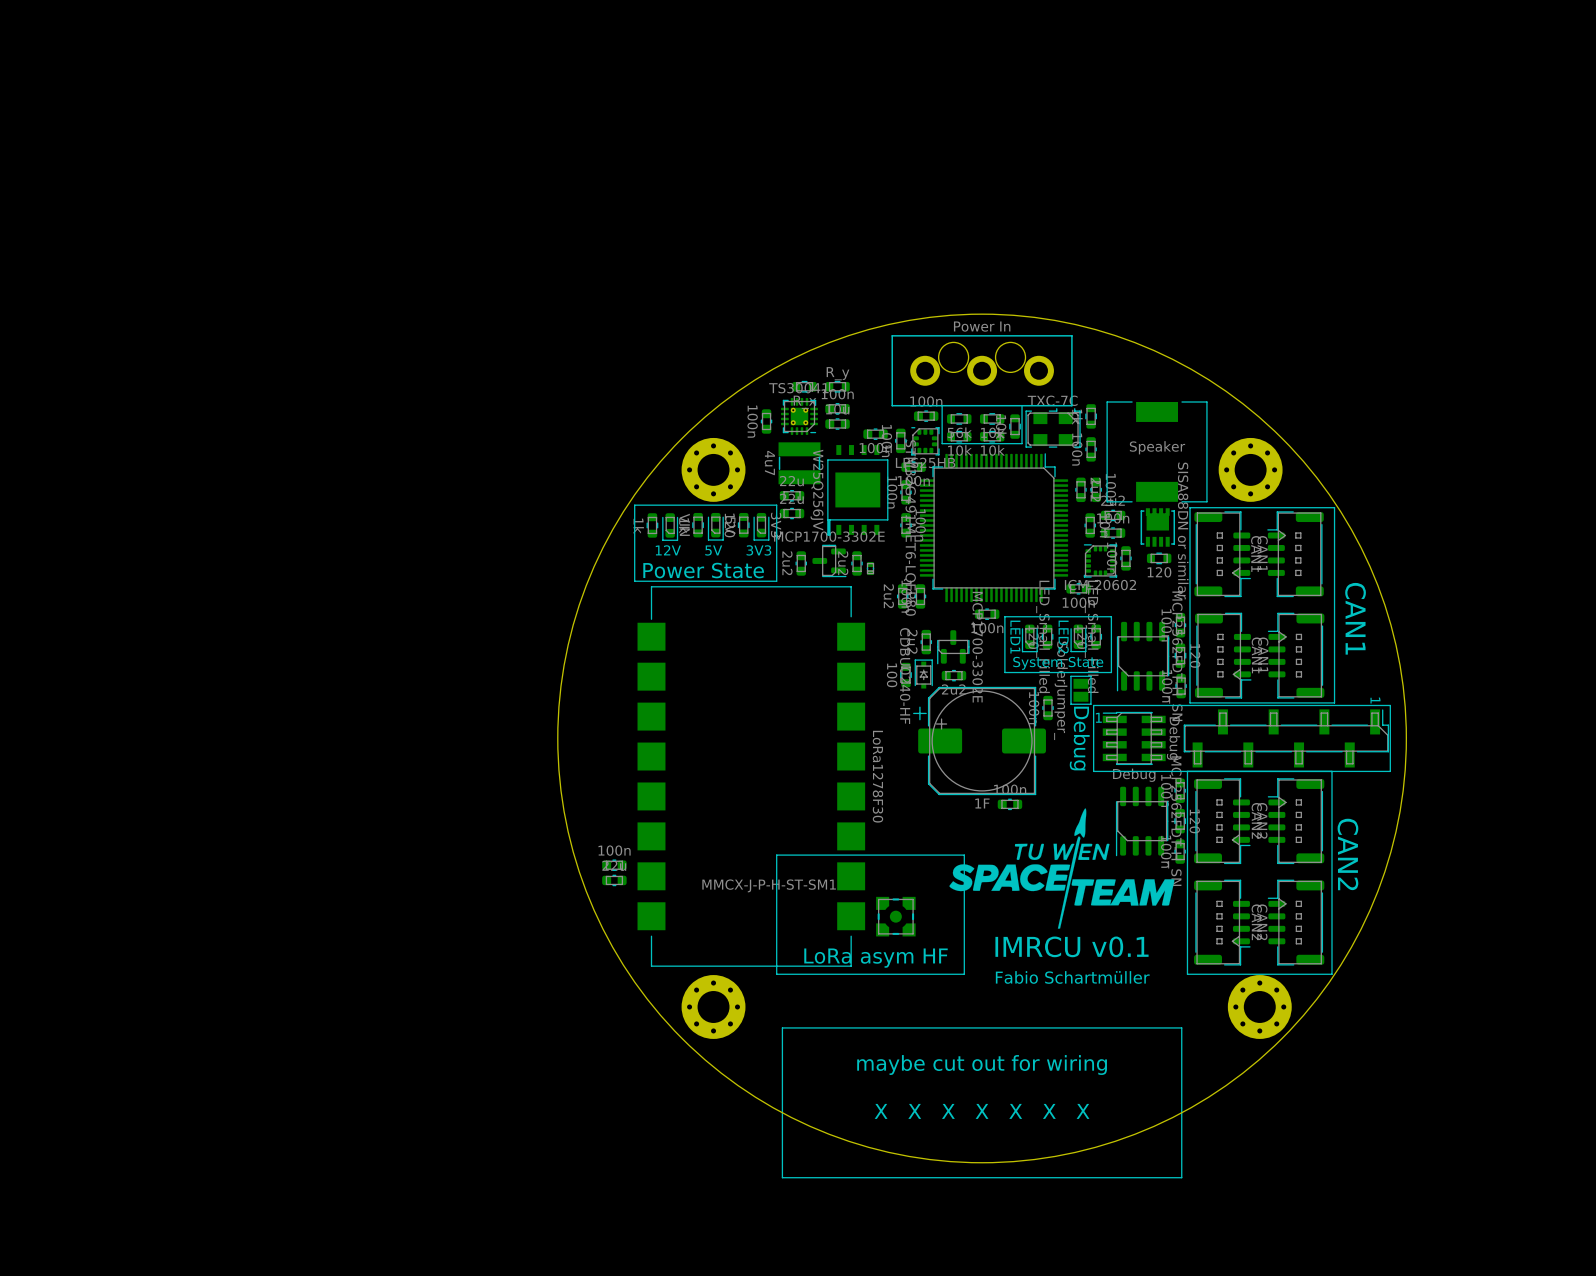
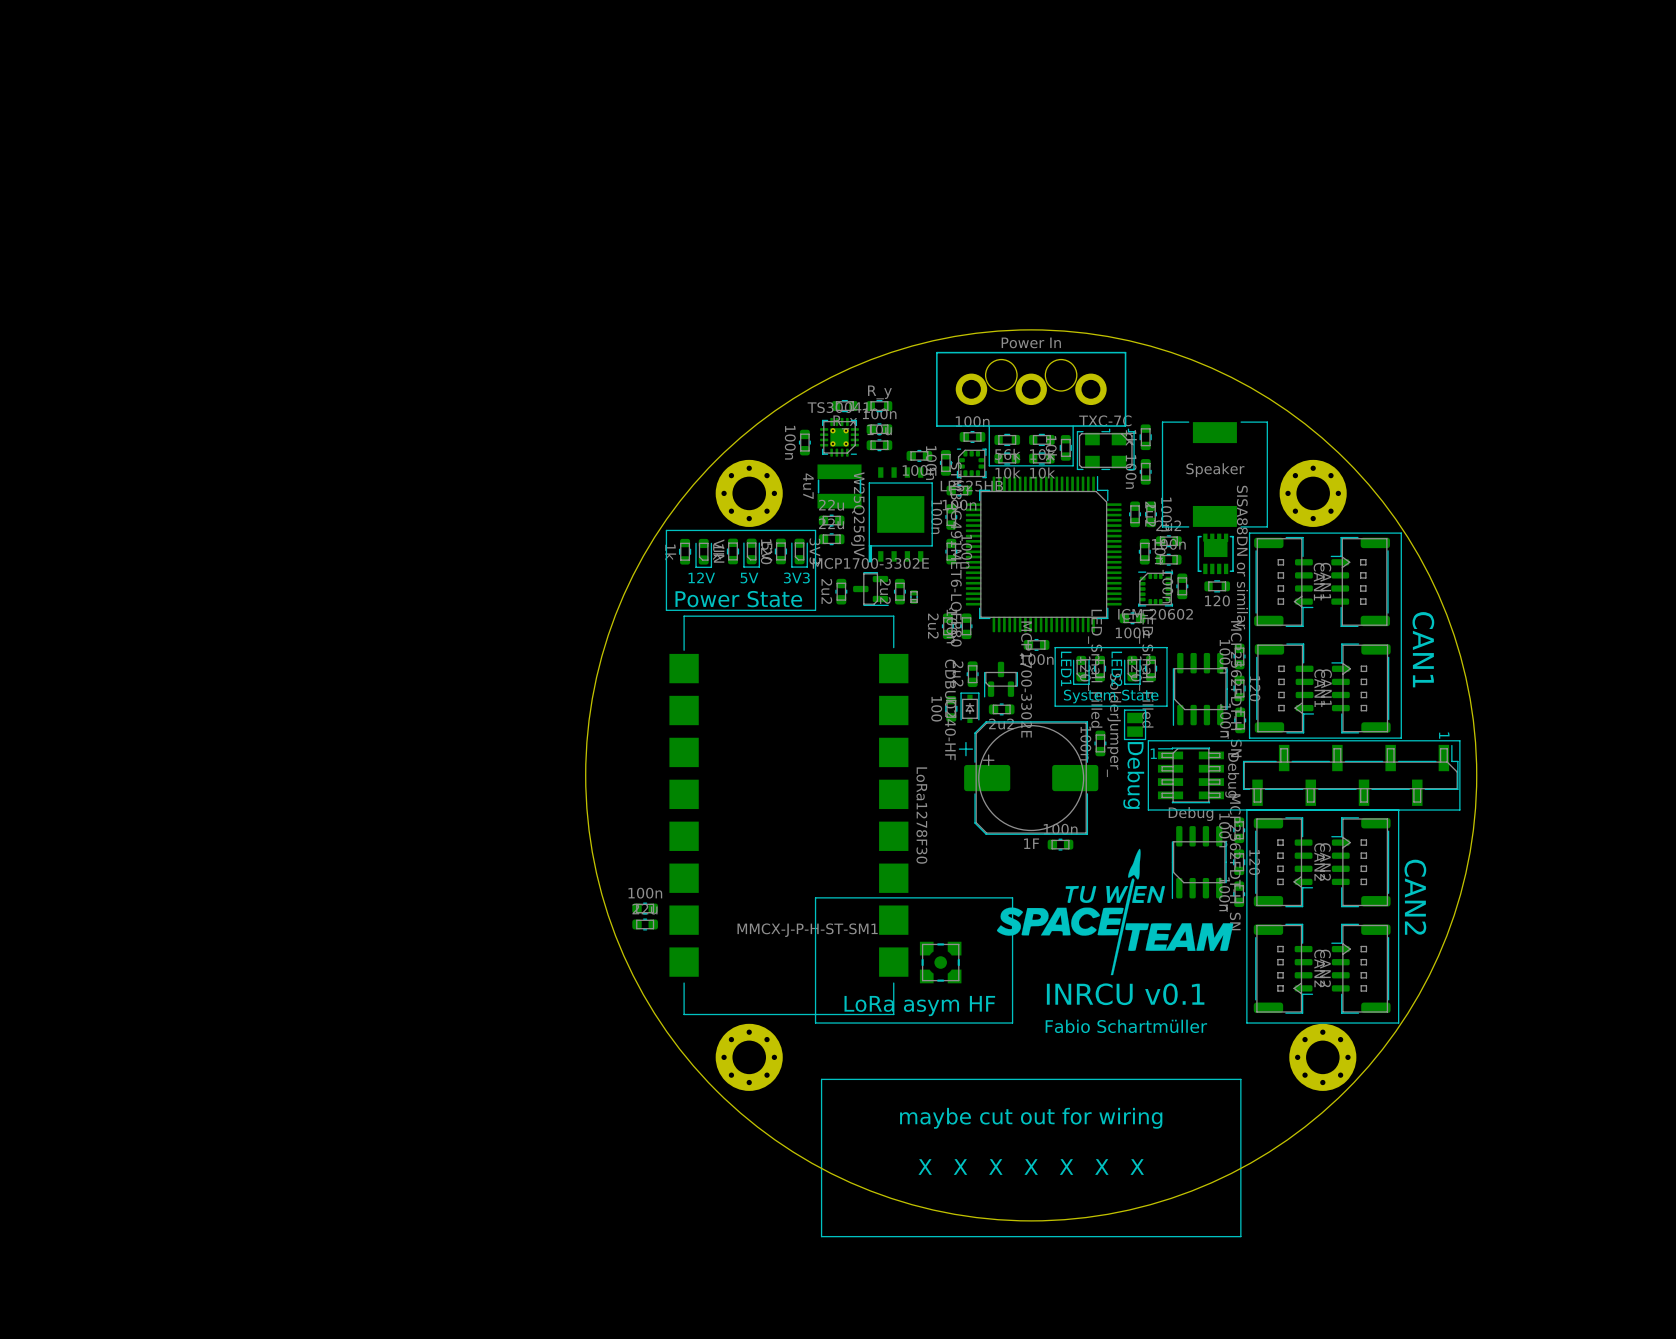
text: IMRCU v0.1 (1072, 946) -> INRCU v0.1 (1125, 994)

